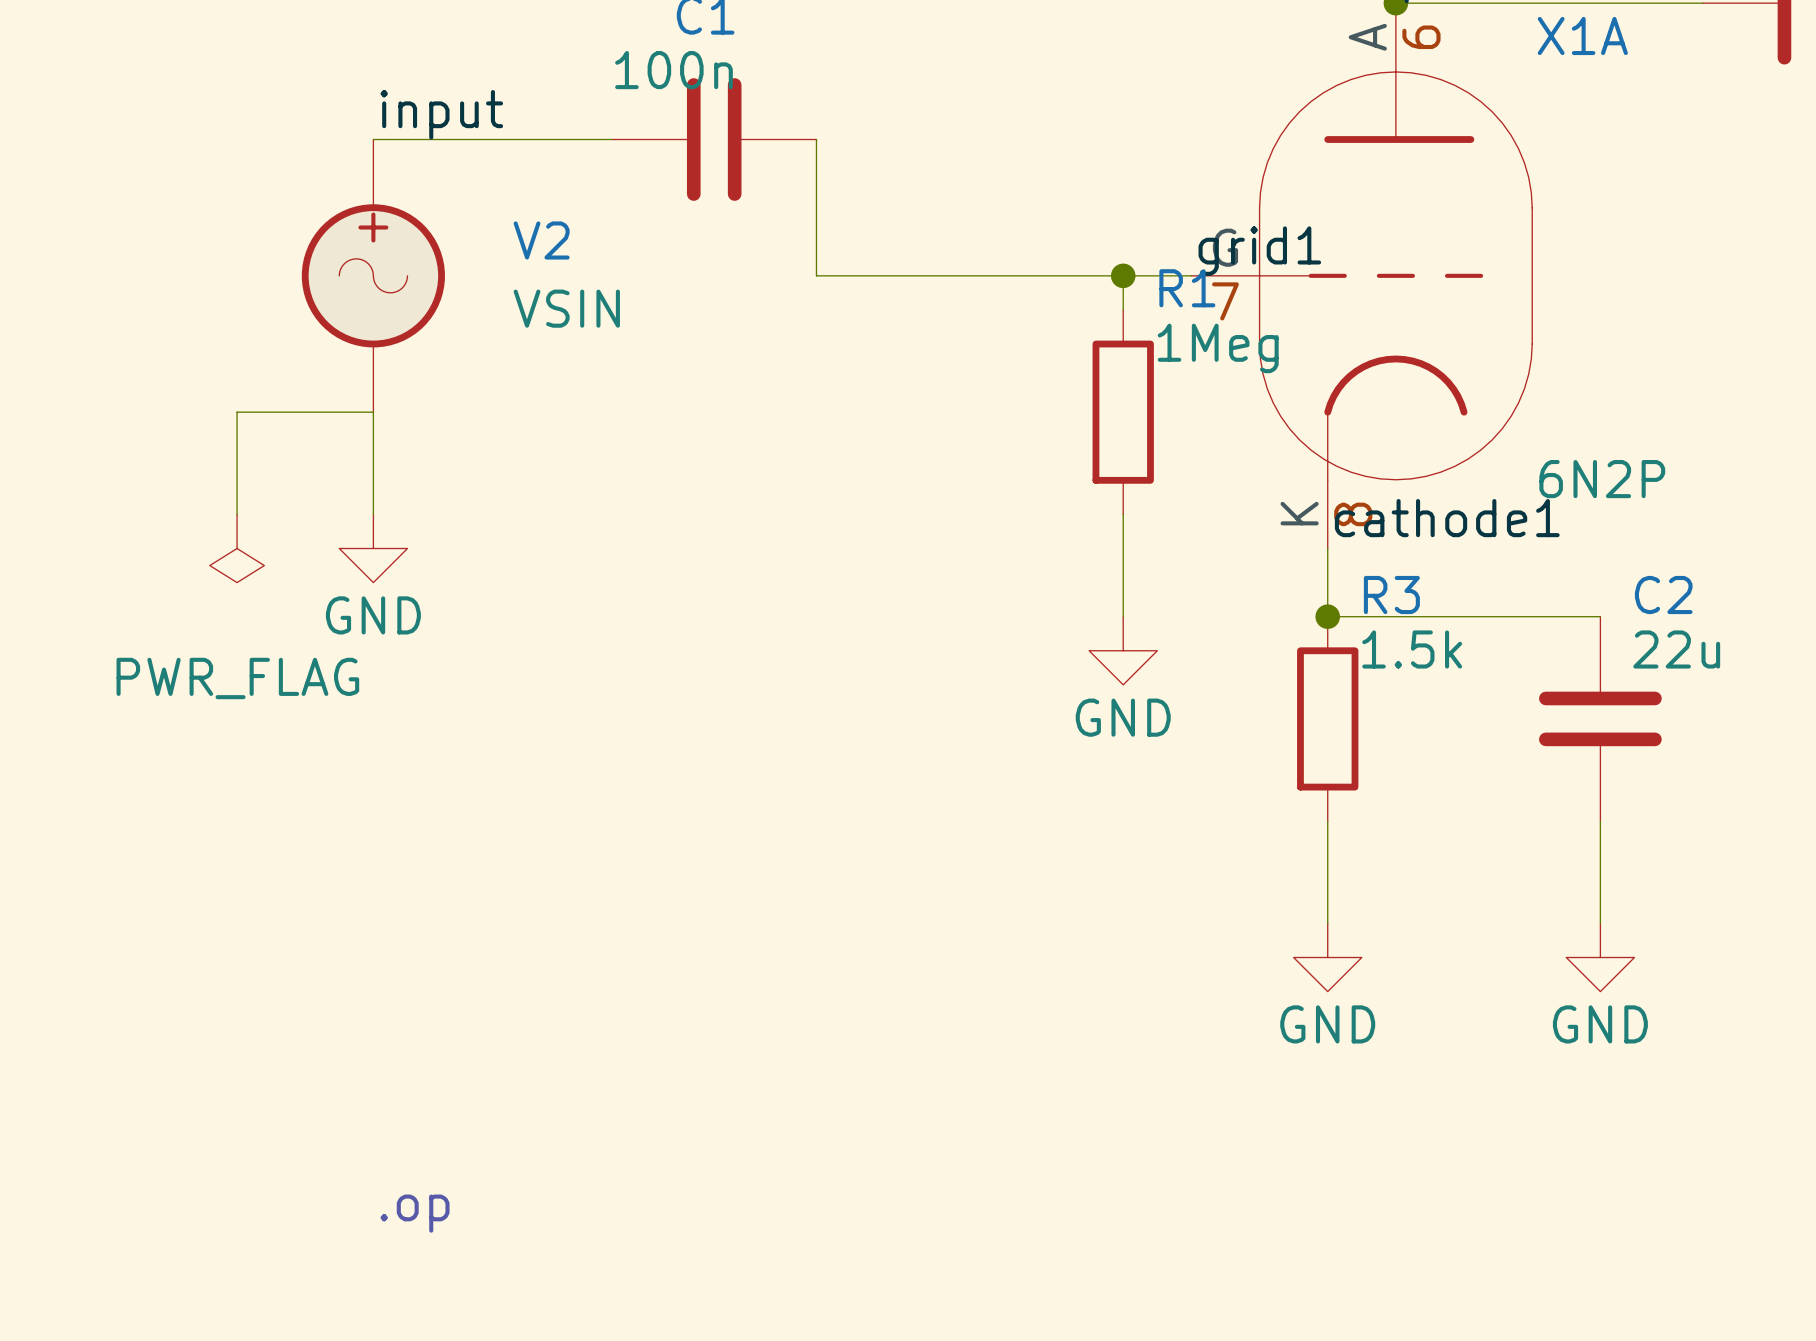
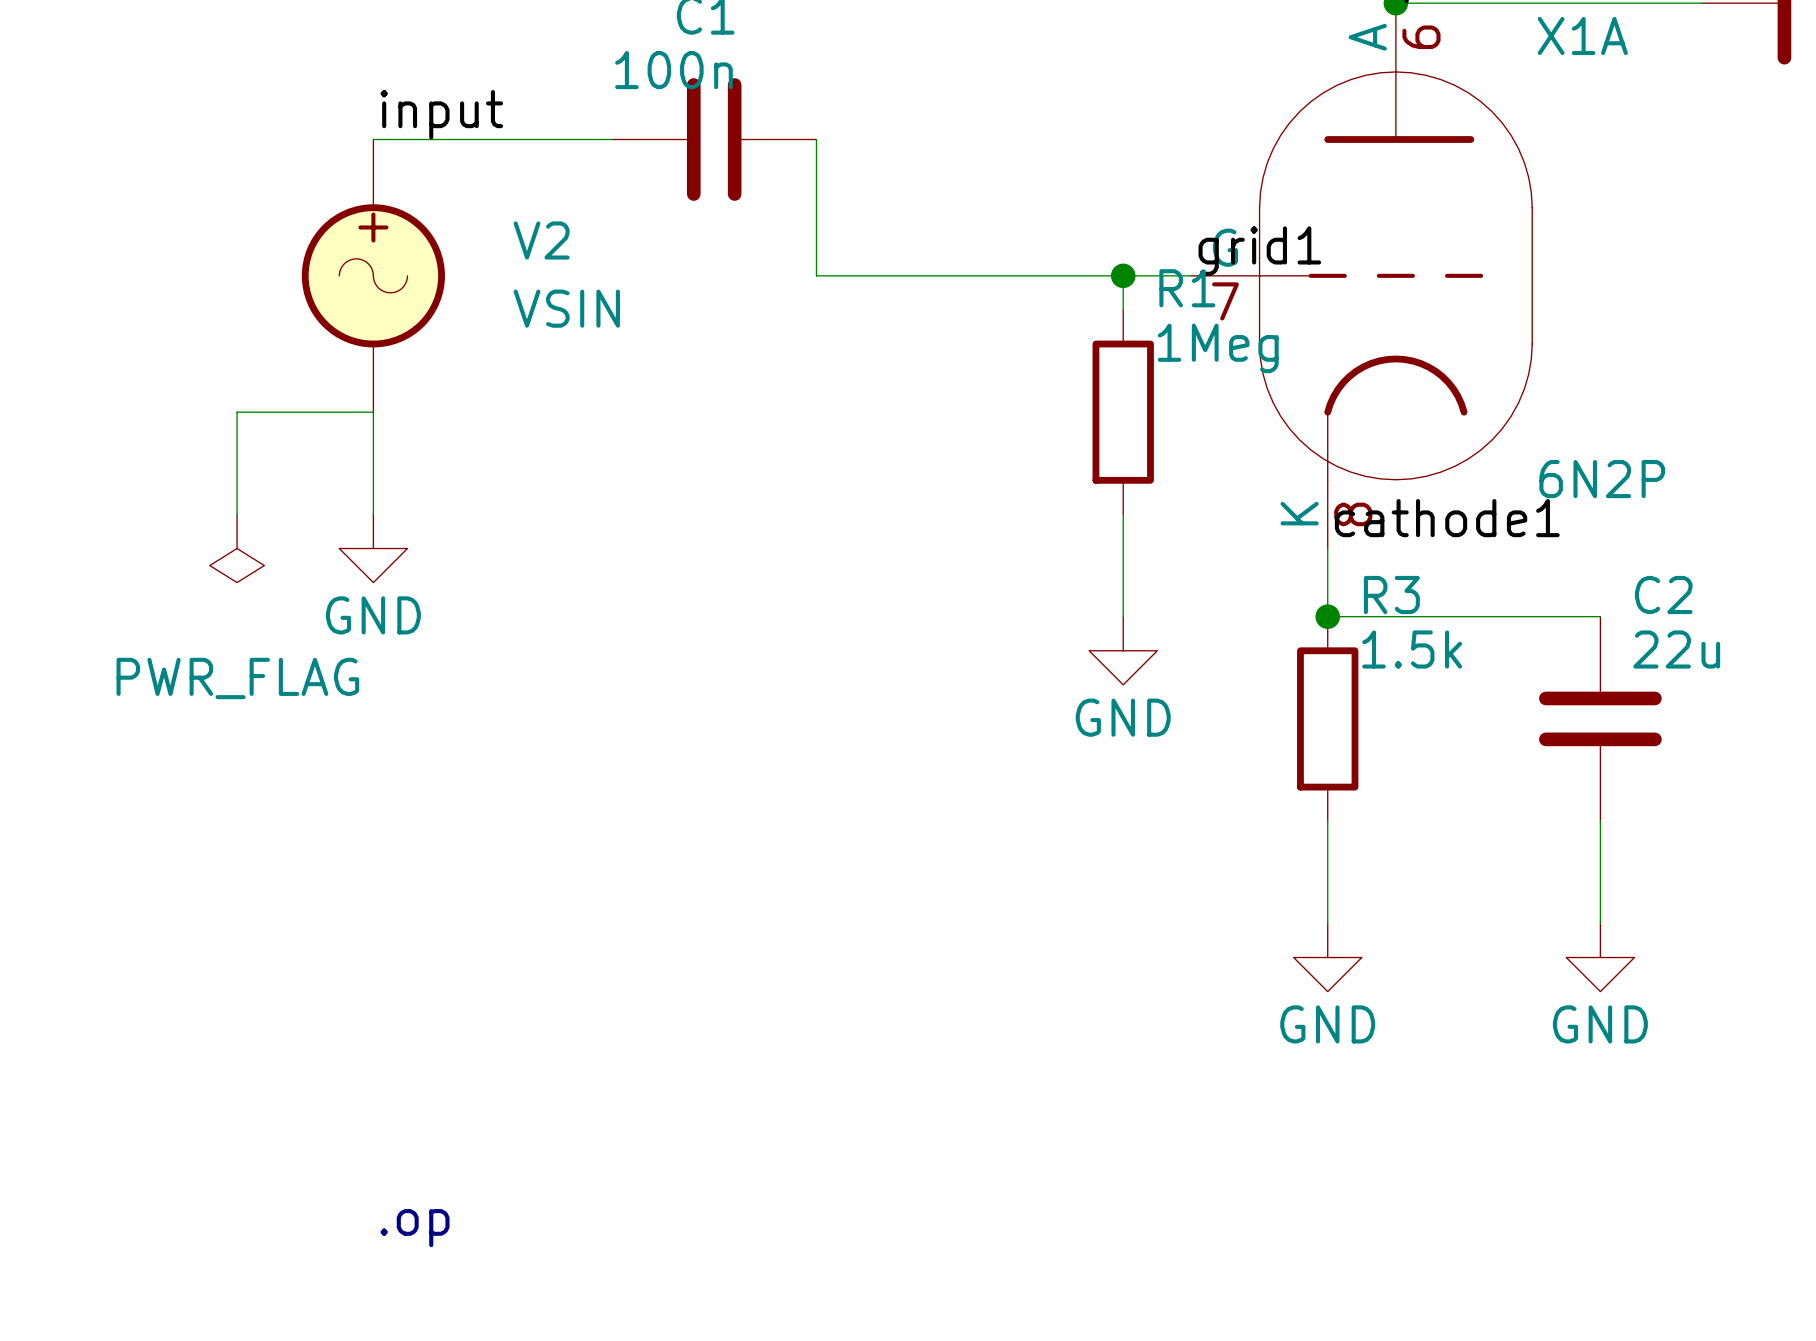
text position: .op (415, 1213) -> .op (415, 1228)

